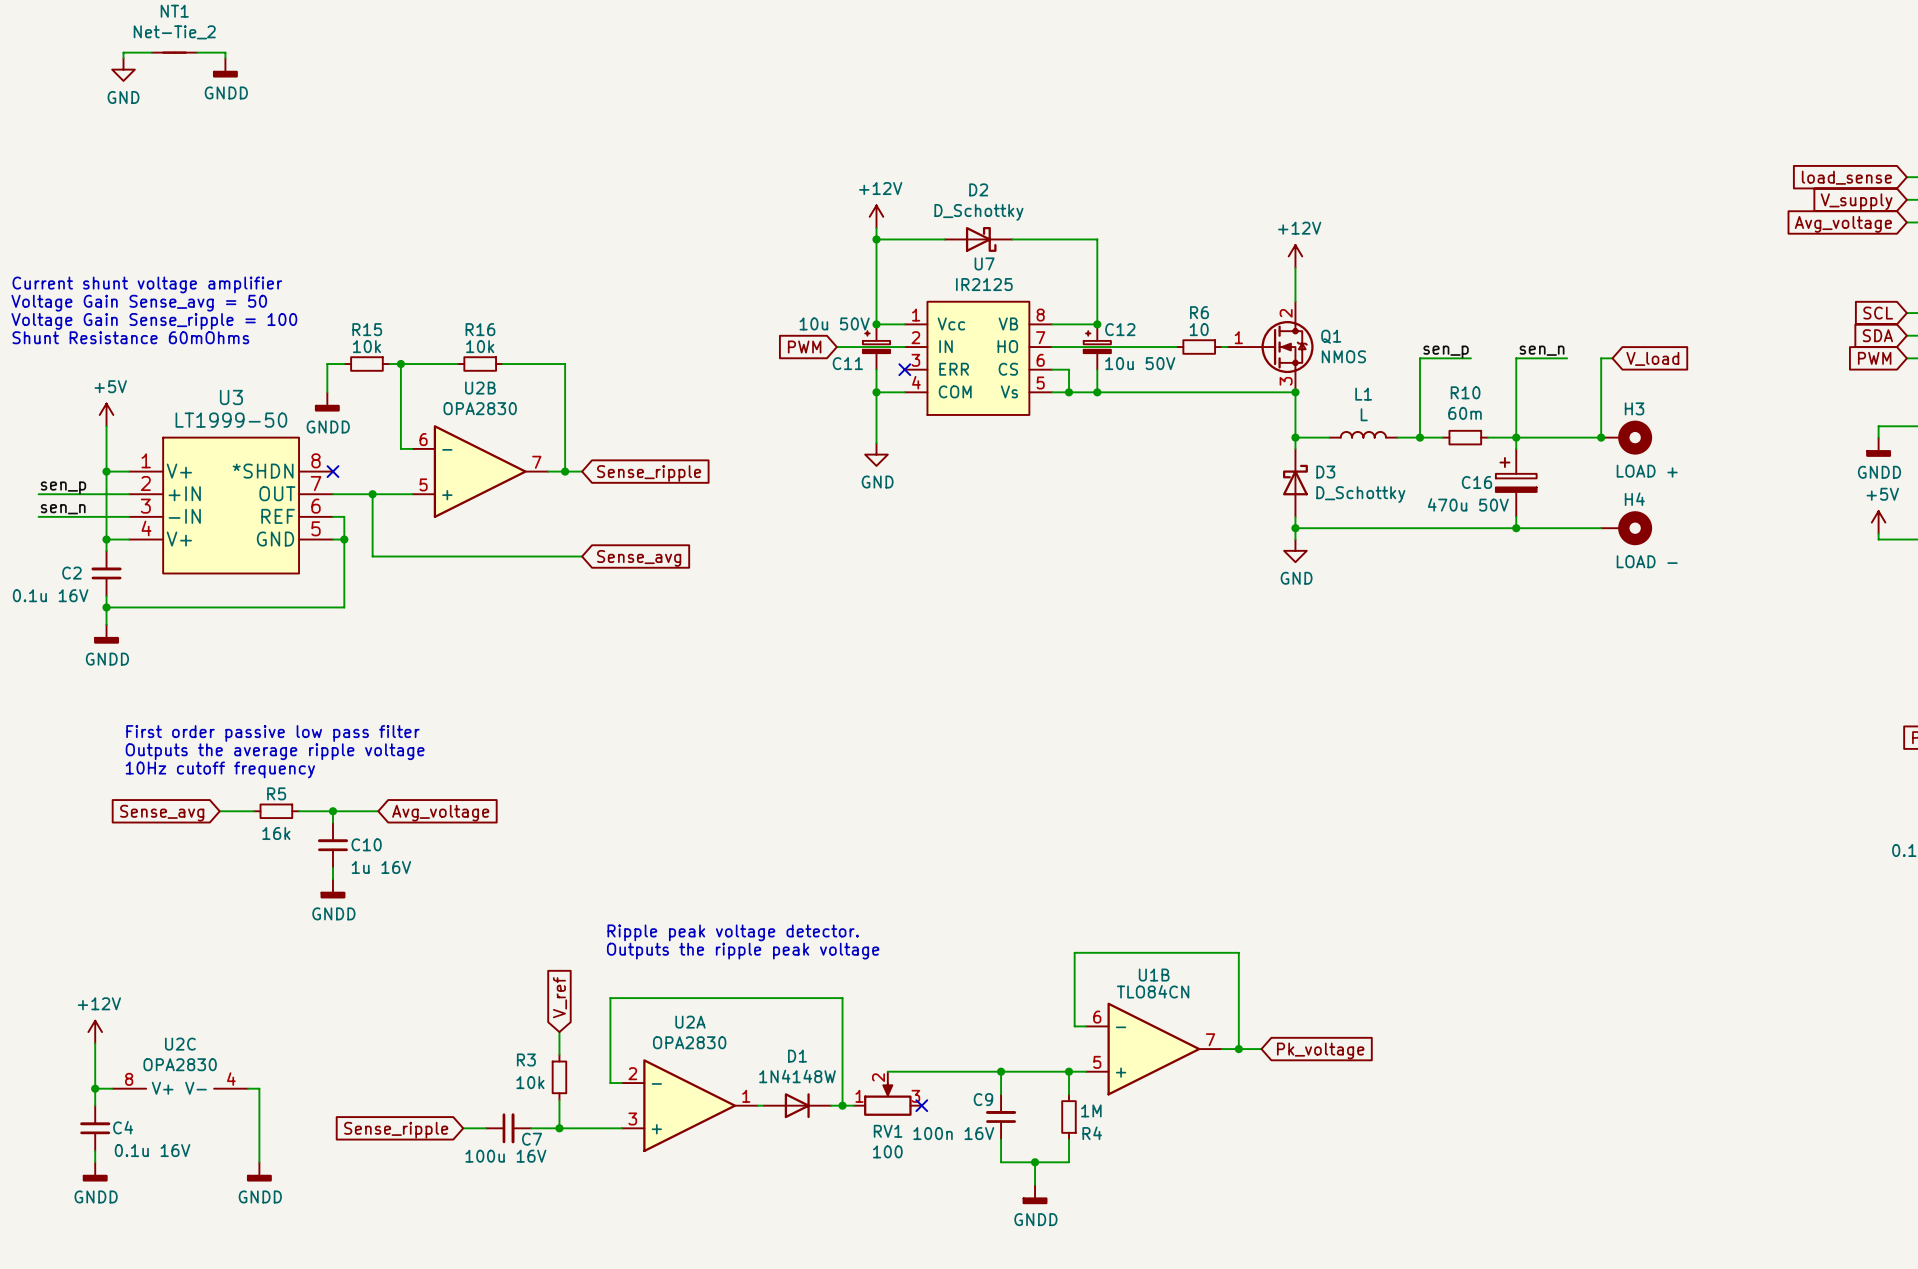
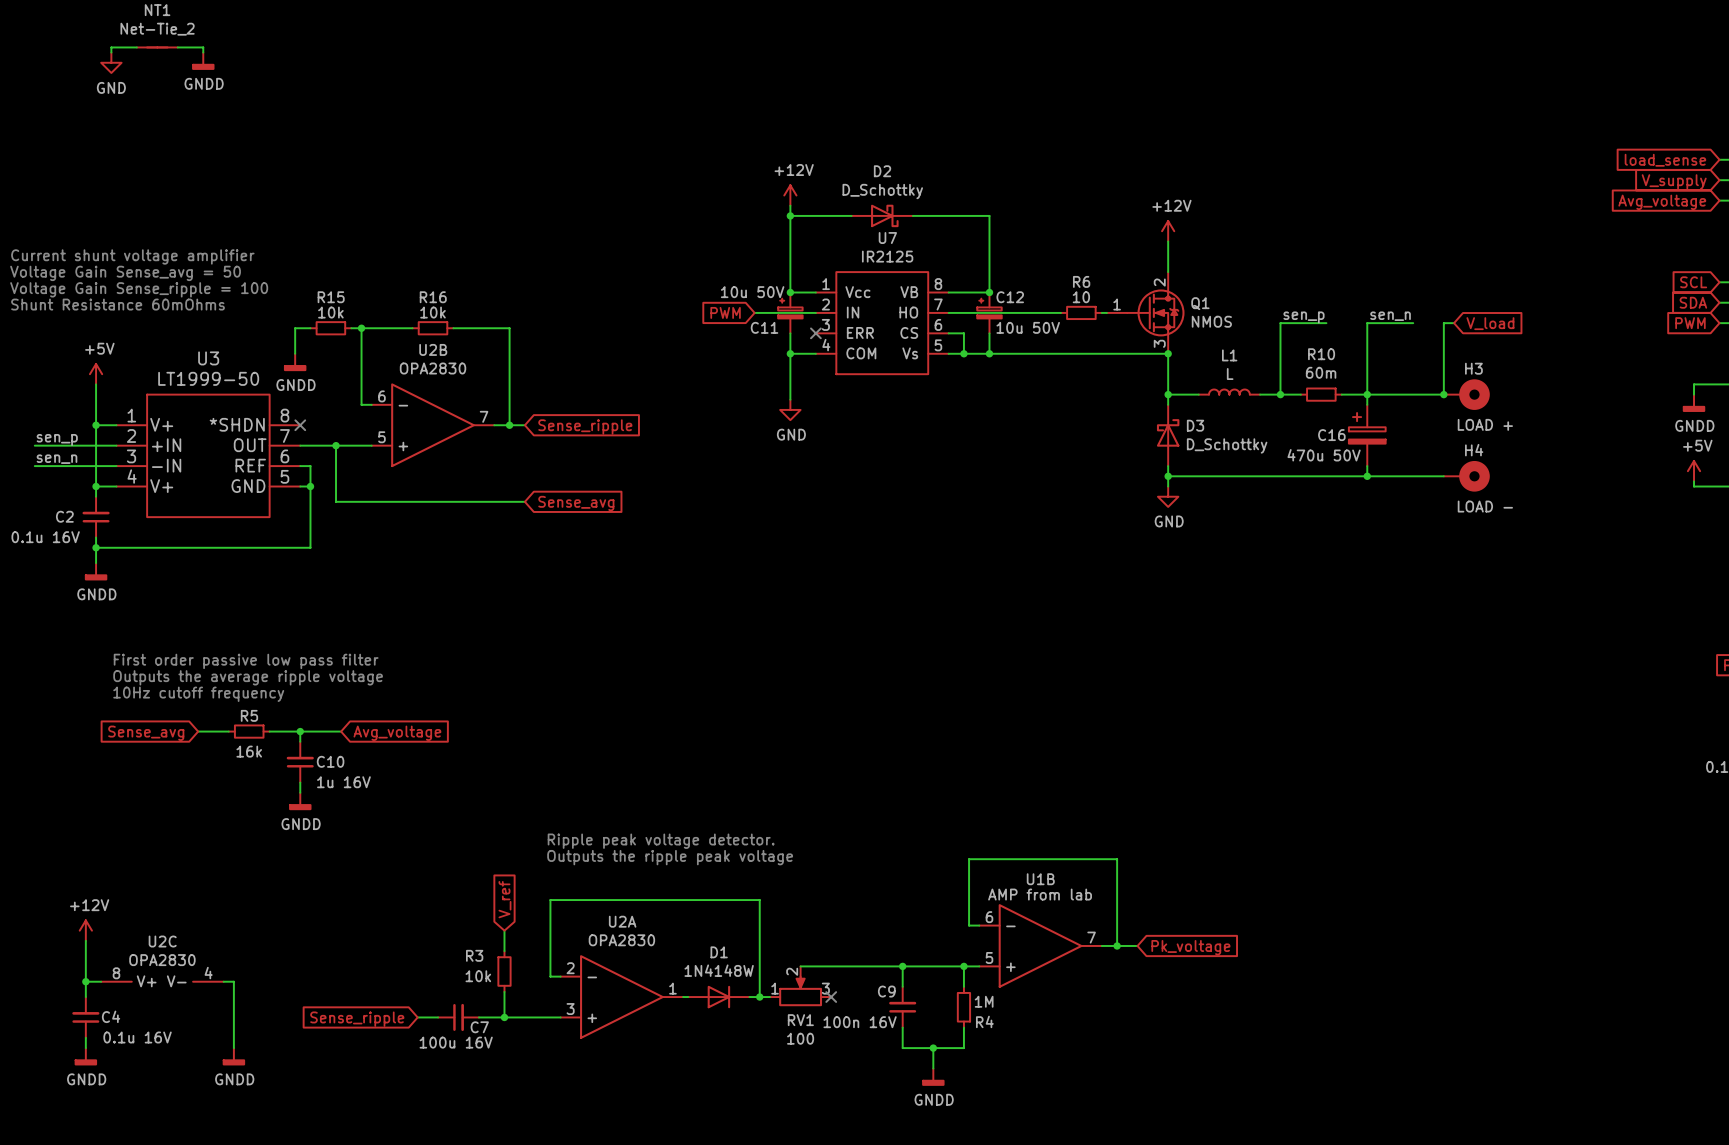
U1B value: TLO84CN (1153, 991) -> AMP from lab (1040, 894)

